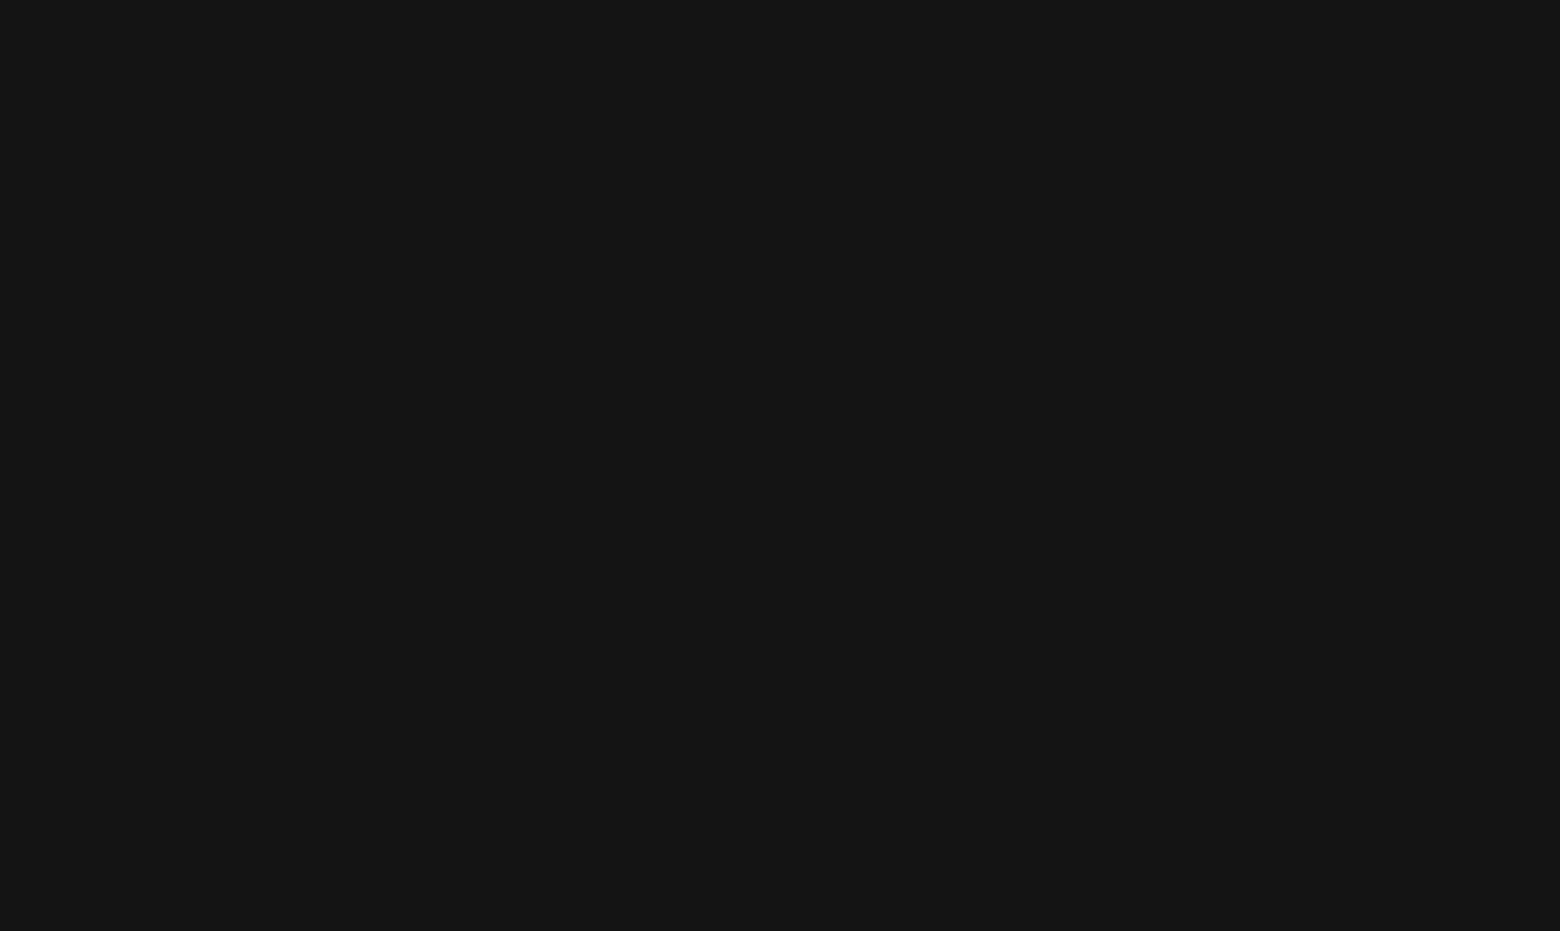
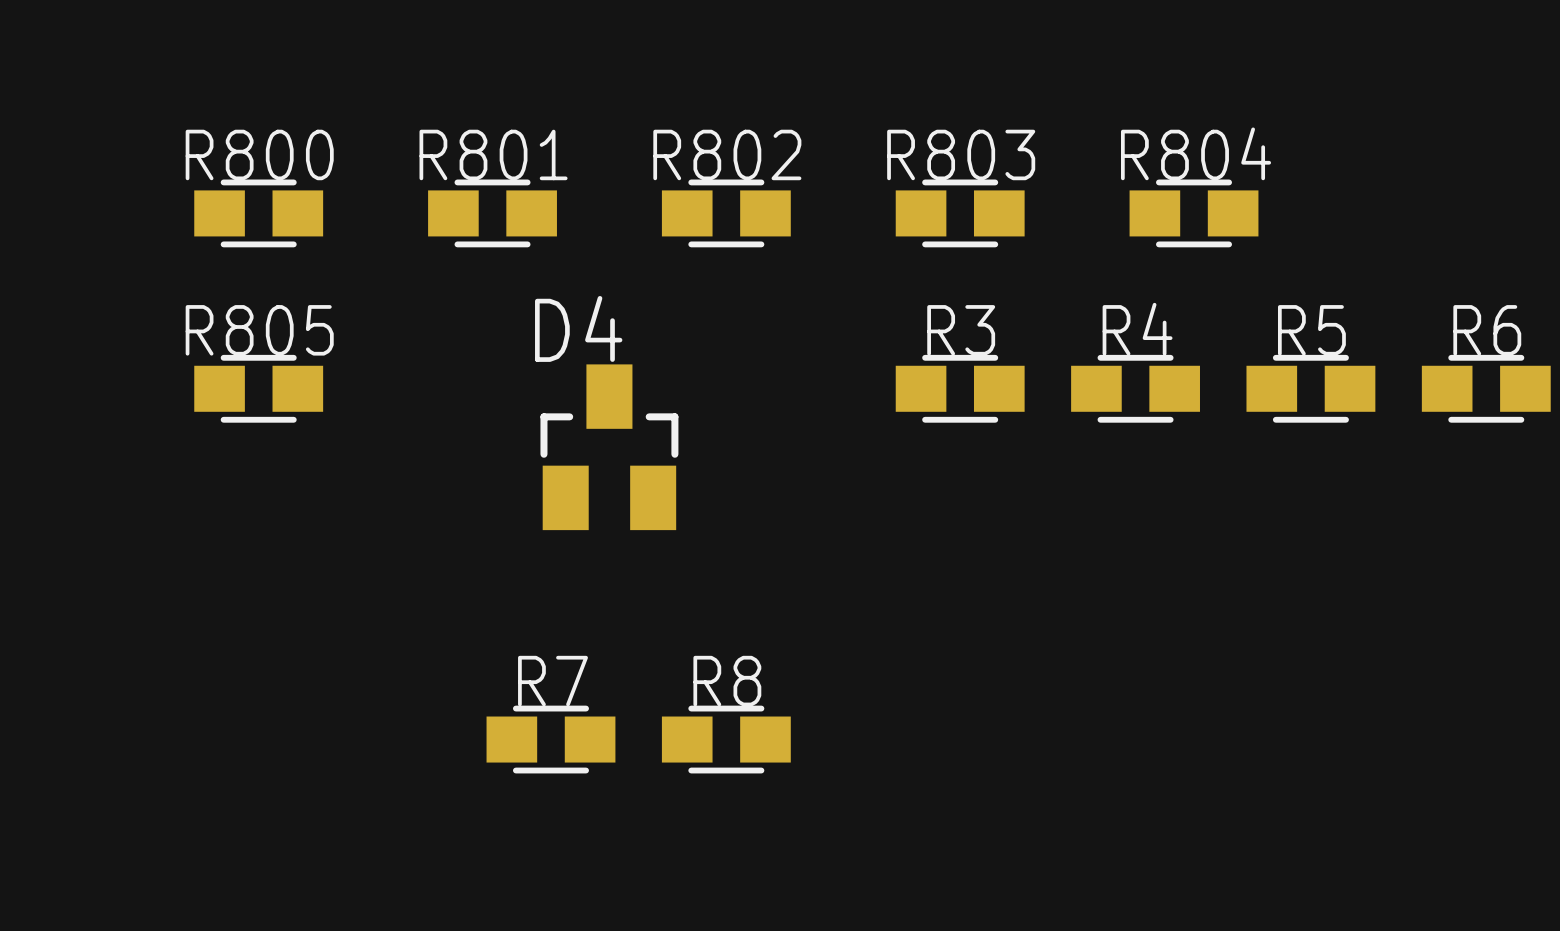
R800: none -> (258, 213)
R801: none -> (492, 213)
R802: none -> (726, 213)
R803: none -> (960, 213)
R804: none -> (1194, 213)
R805: none -> (258, 388)
R3: none -> (960, 388)
R4: none -> (1135, 388)
R5: none -> (1310, 388)
R6: none -> (1486, 388)
D4: none -> (609, 447)
R7: none -> (550, 739)
R8: none -> (726, 739)

